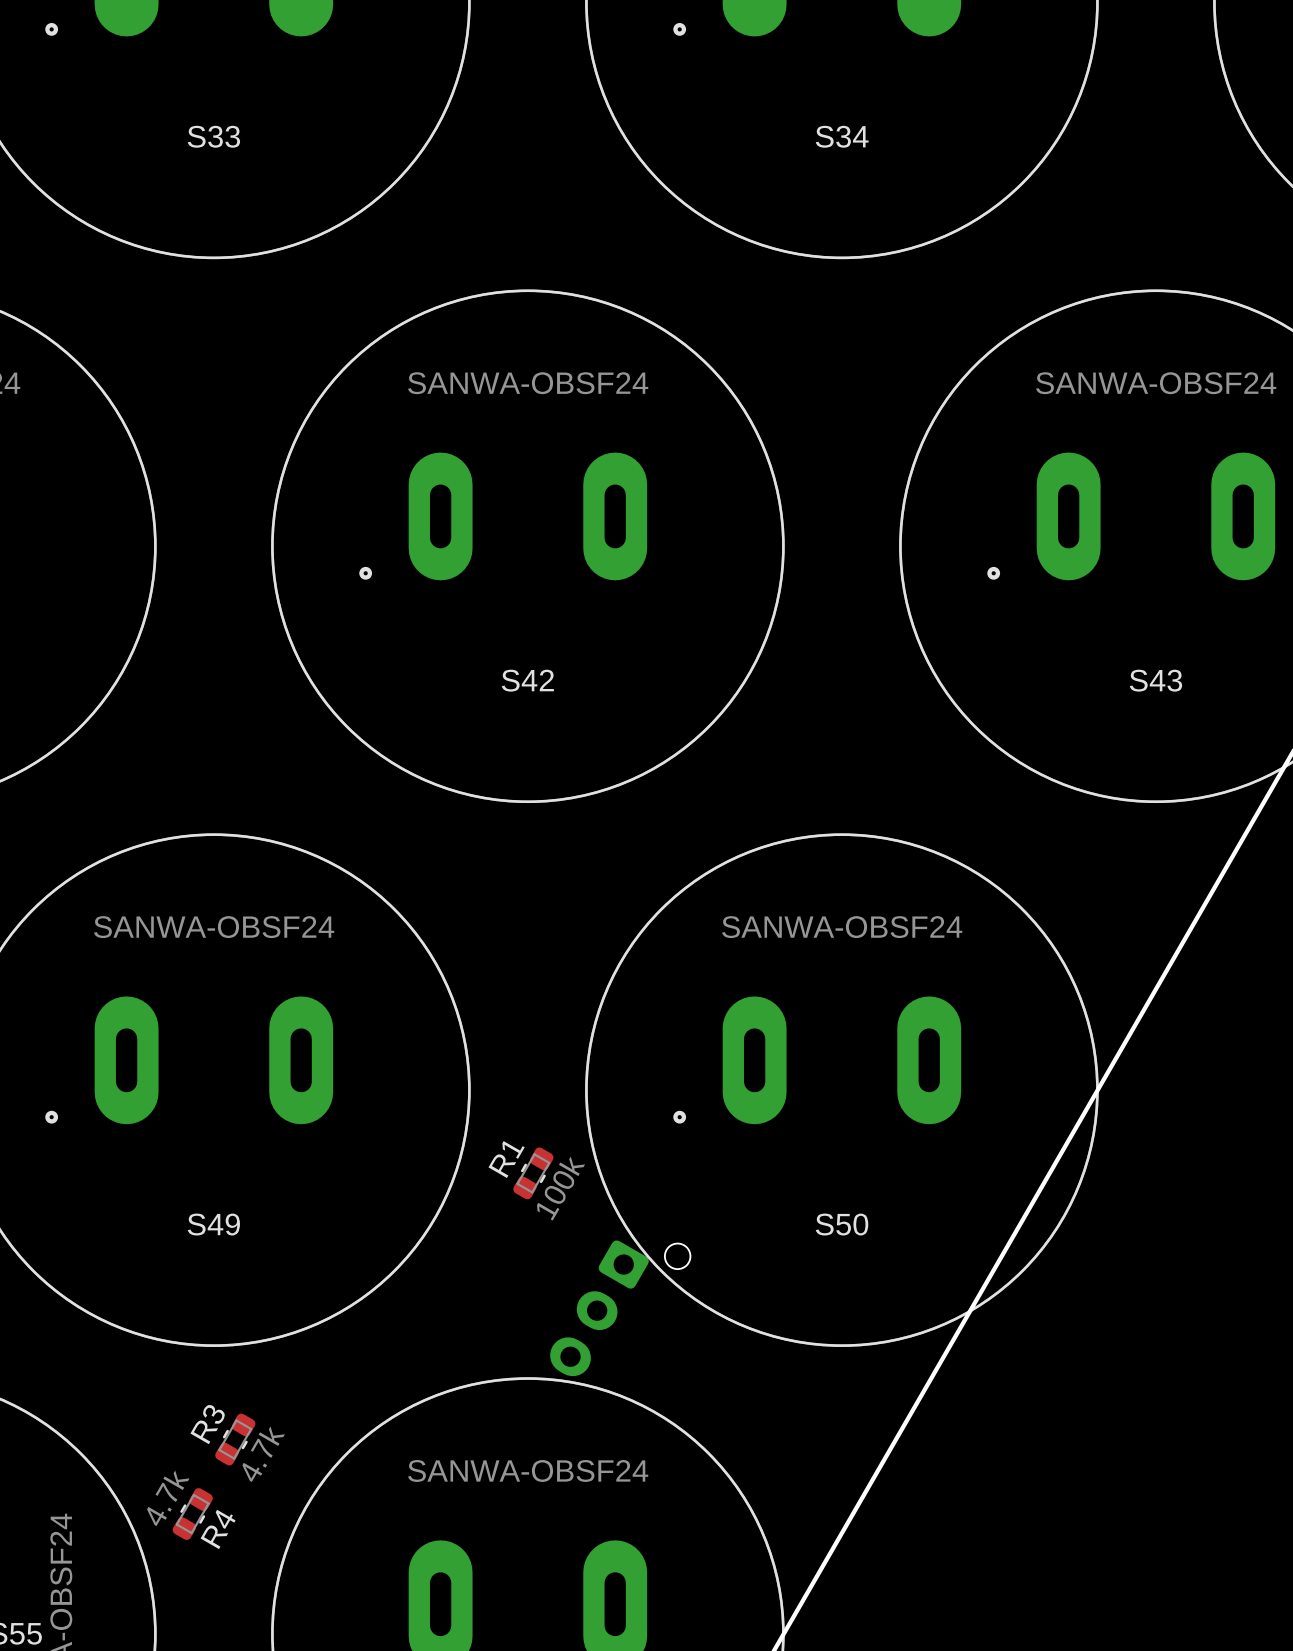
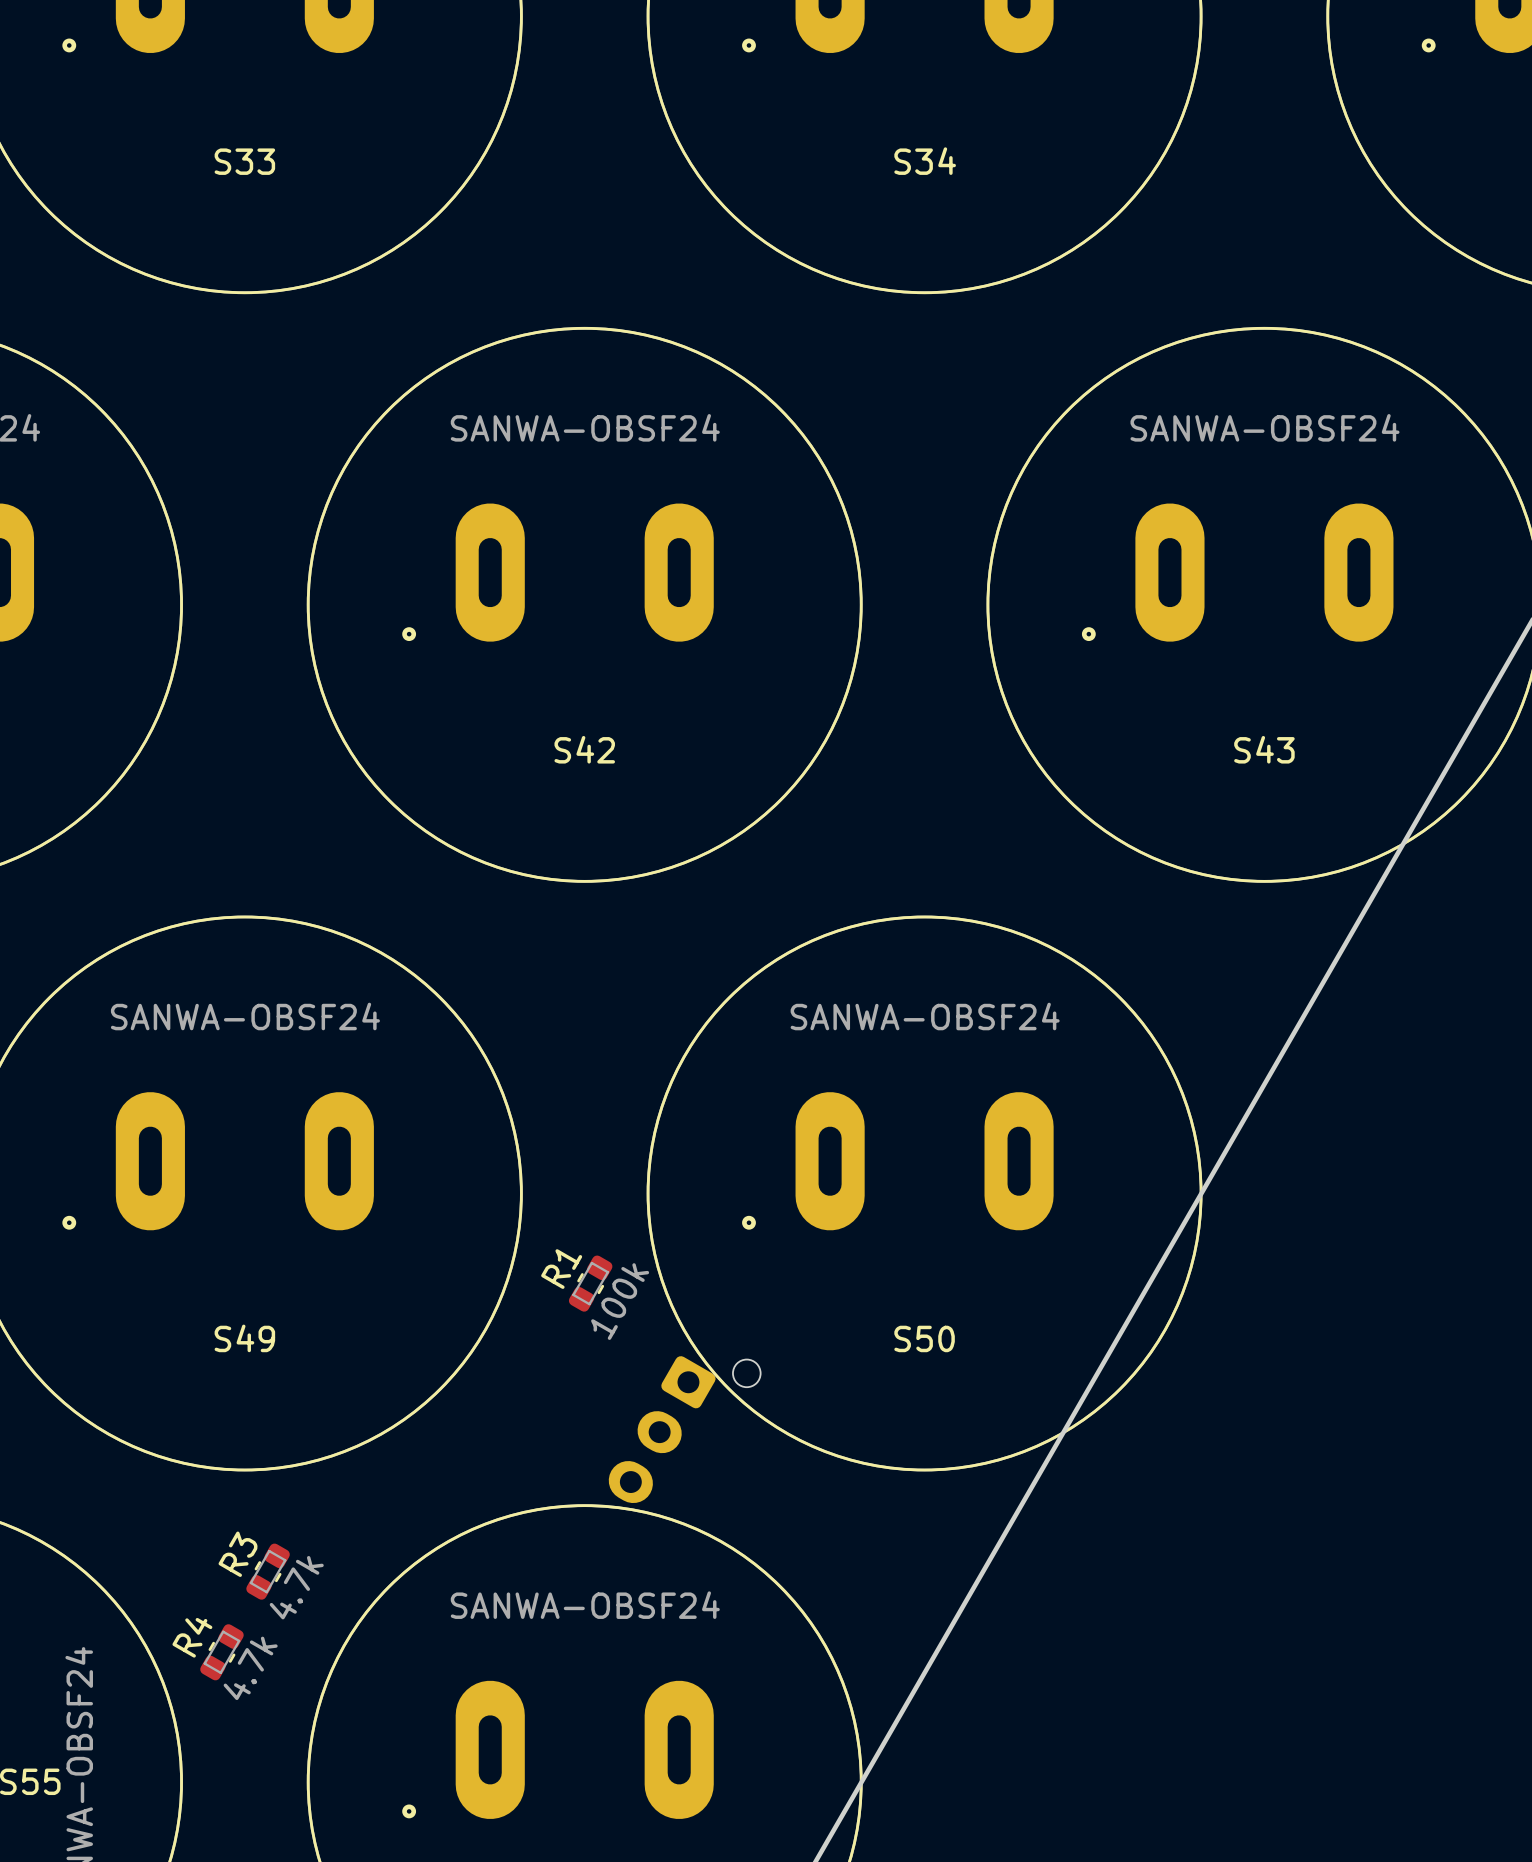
R4 value position: 4.7k (168, 1498) -> 4.7k (250, 1668)
R4 name position: R4 (218, 1529) -> R4 (192, 1637)

